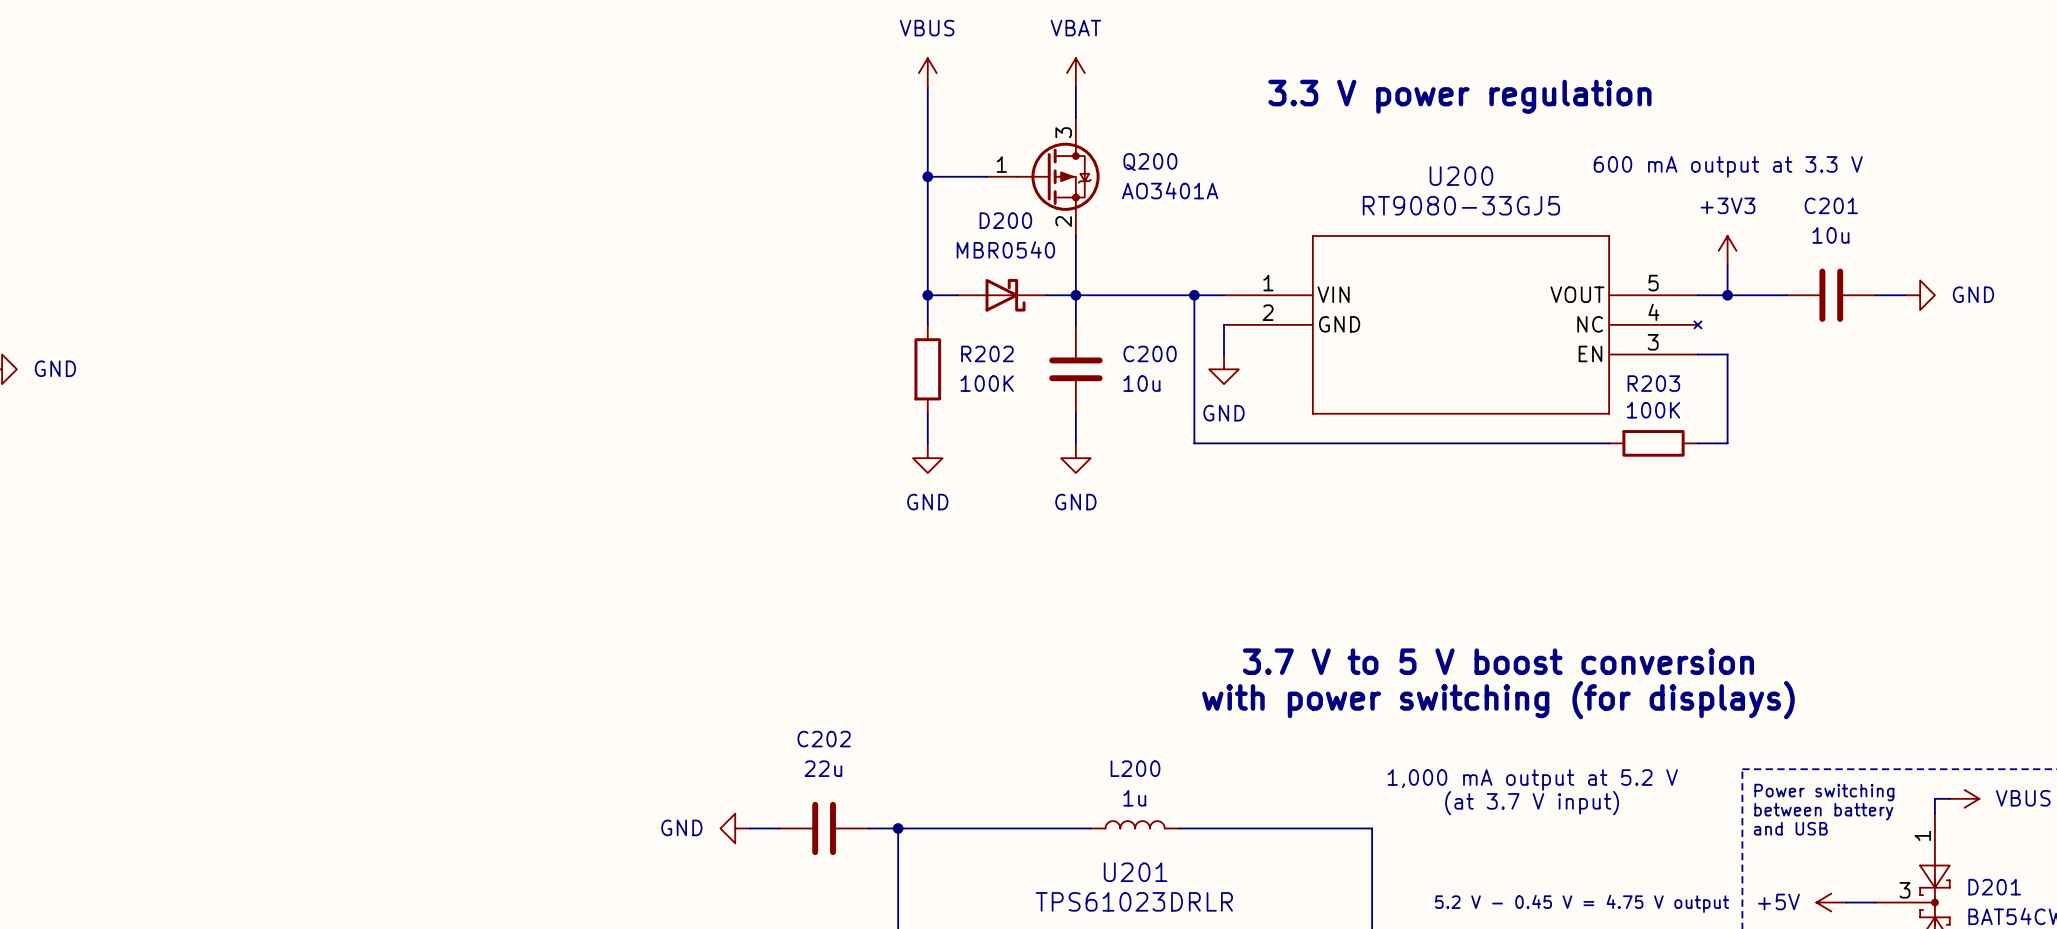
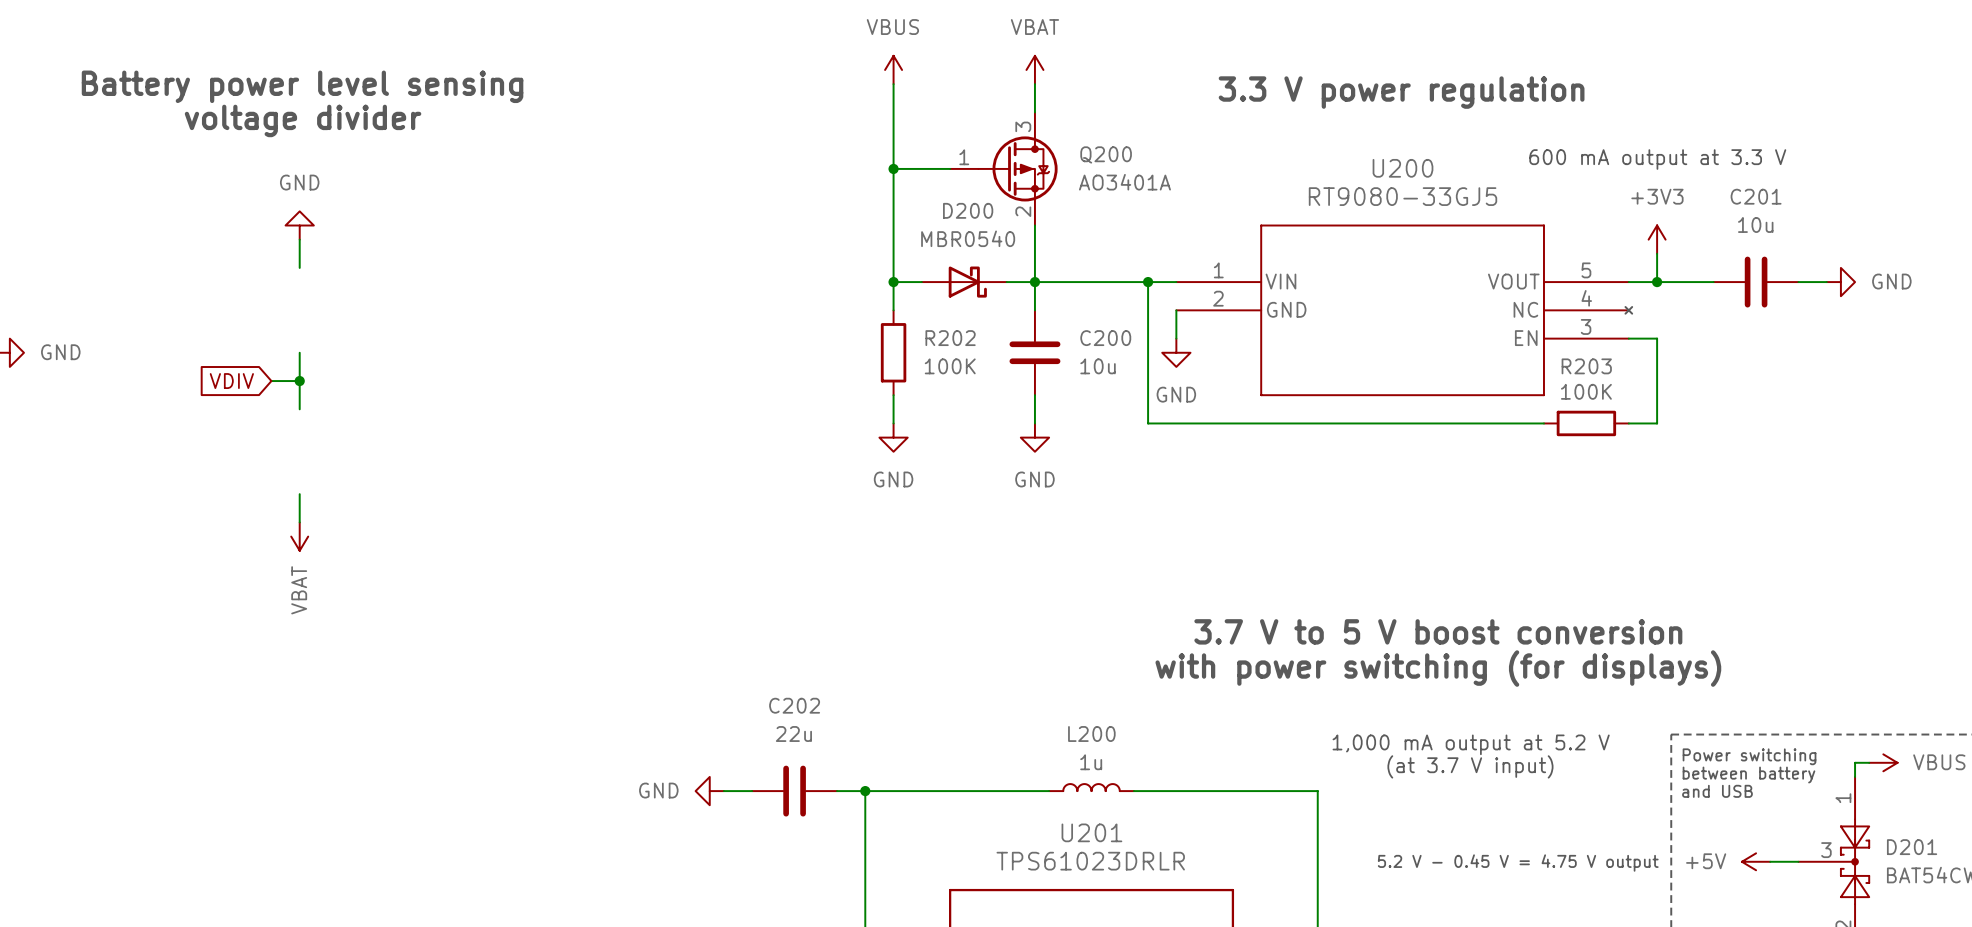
text: none -> Battery power level sensing (302, 86)
text: none -> voltage divider (303, 120)
power symbol: none -> GND (299, 225)
wire: none -> (299, 239) (299, 267)
wire: none -> (299, 352) (299, 409)
global label: none -> VDIV (231, 381)
wire: none -> (271, 381) (299, 381)
junction: none -> (299, 381)
wire: none -> (299, 494) (299, 522)
power symbol: none -> VBAT (299, 536)

